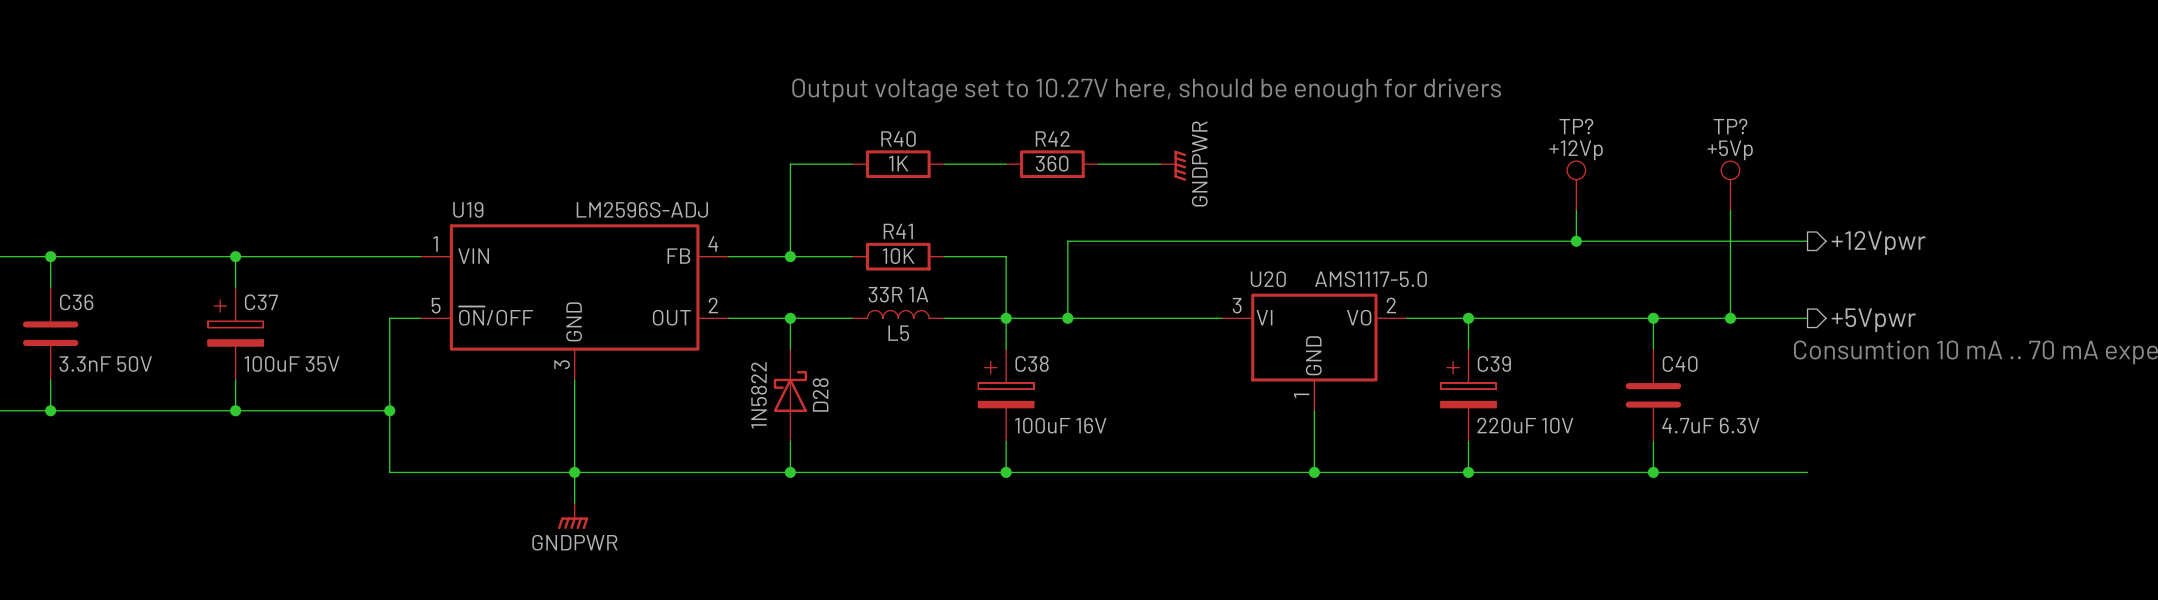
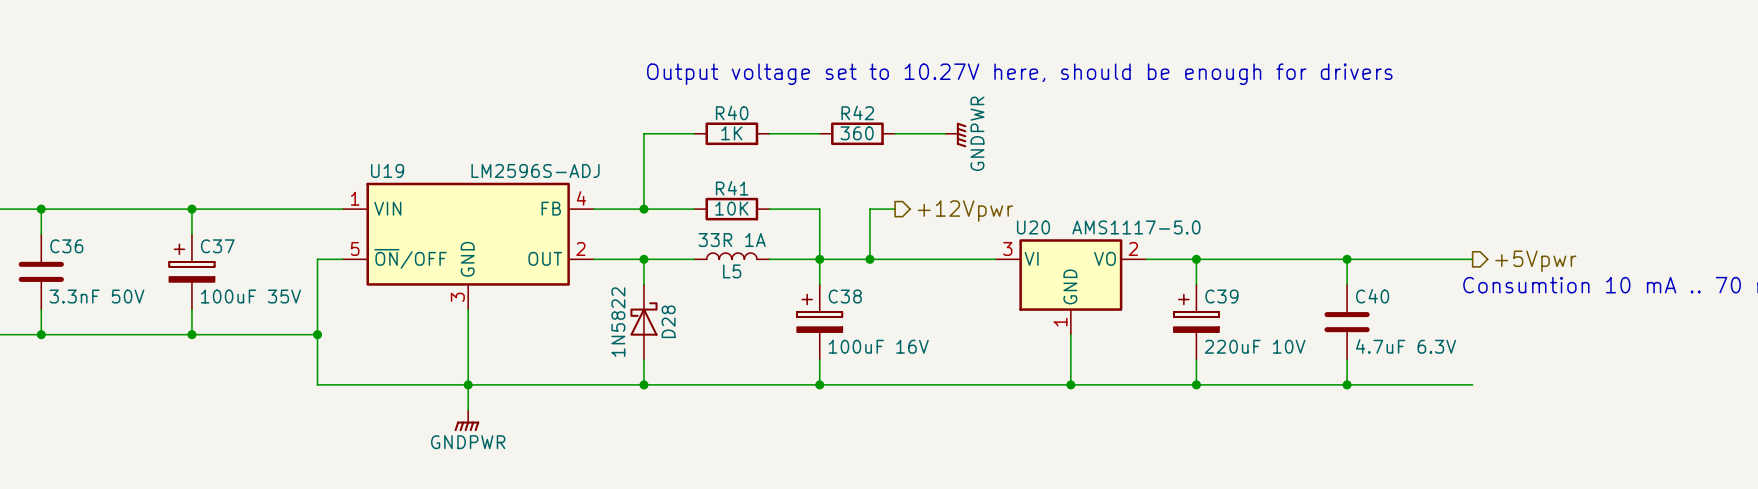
TP?: +12Vp (1576, 185) -> none
TP?: +5Vp (1730, 185) -> none
wire: (1576, 210) (1576, 241) -> none
wire: (1730, 210) (1730, 318) -> none
junction: (1576, 241) -> none
wire: (1807, 241) (1067, 241) (1067, 256) -> (895, 209) (869, 209)
hierarchical label: +12Vpwr (1878, 243) -> none
hierarchical label: none -> +12Vpwr (965, 211)
junction: (1730, 318) -> none

